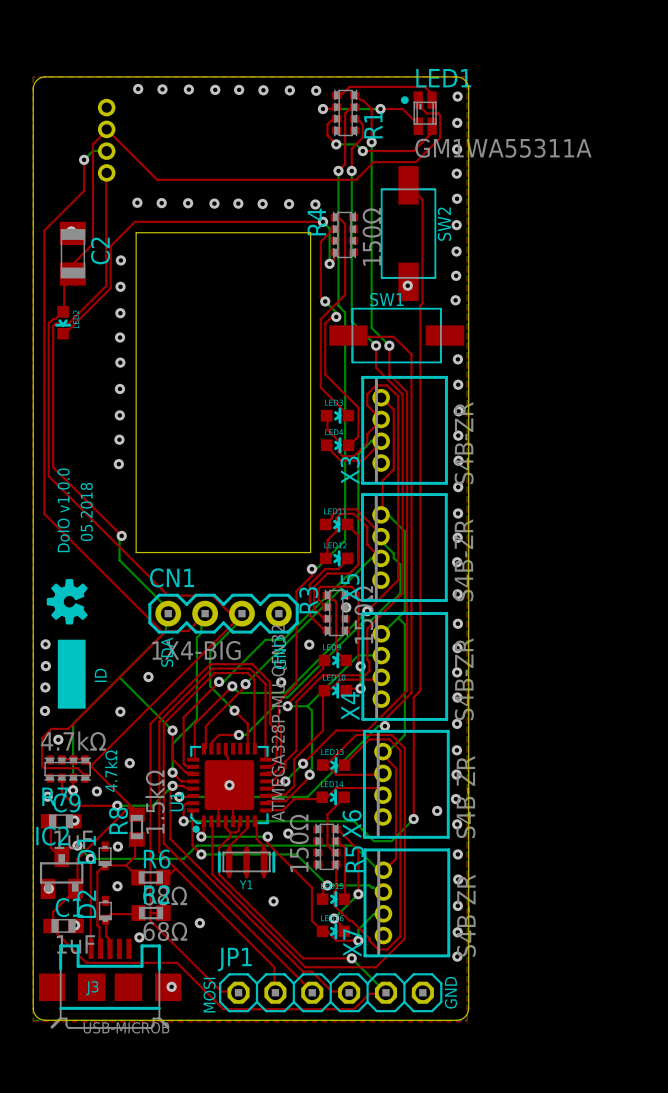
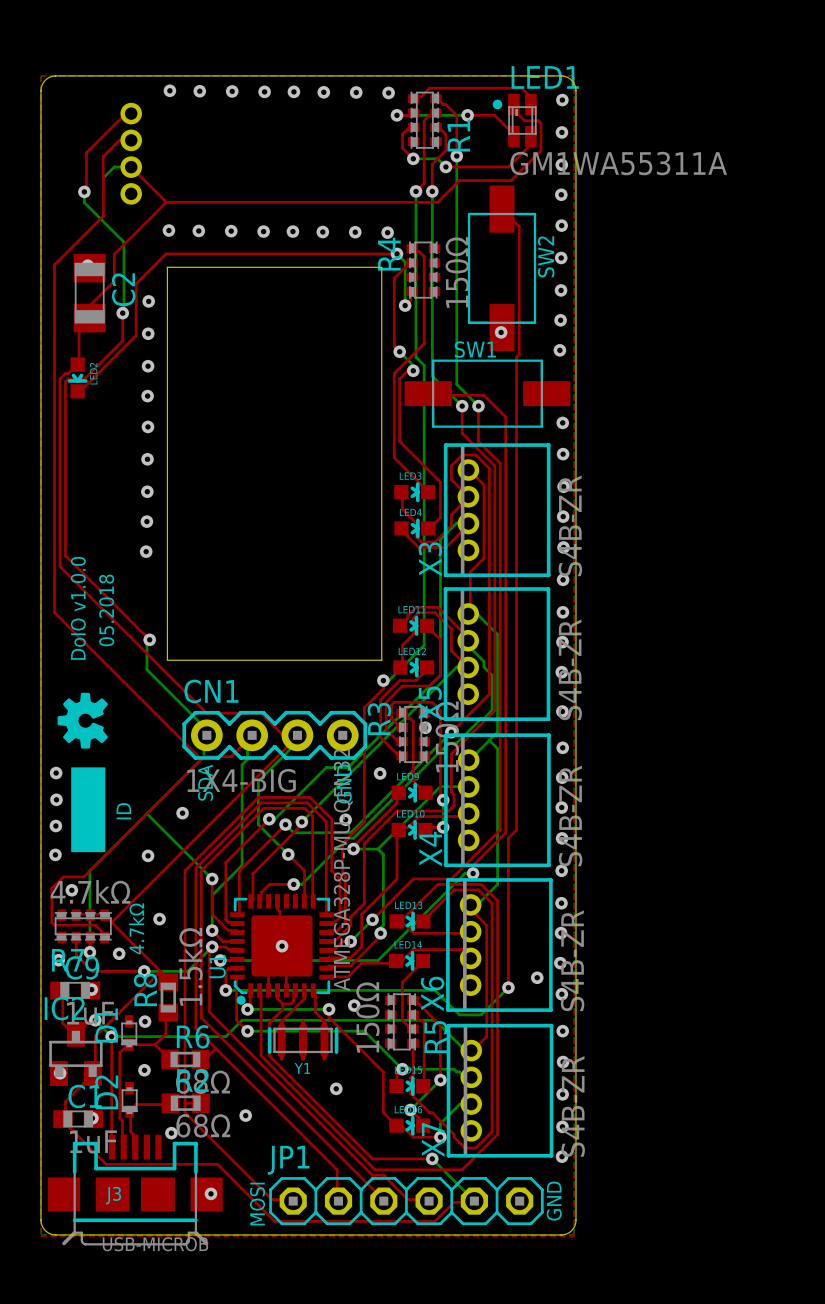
top track: none -> (131, 113) (125, 113) (86, 152) (86, 189) (84, 191)
top track: none -> (131, 140) (119, 140) (103, 156) (103, 177)
top track: none -> (131, 167) (166, 202)
via position: (84, 159) -> (84, 191)
bottom track: none -> (84, 191) (84, 202) (123, 242) (122, 313)
top track: (106, 172) (106, 285) (99, 292) -> (122, 313) (122, 340)
top track: none -> (166, 202) (193, 202)
top track: (157, 179) (106, 129) (92, 144) (92, 222) -> (166, 202) (114, 254)
via: none -> (122, 313)

